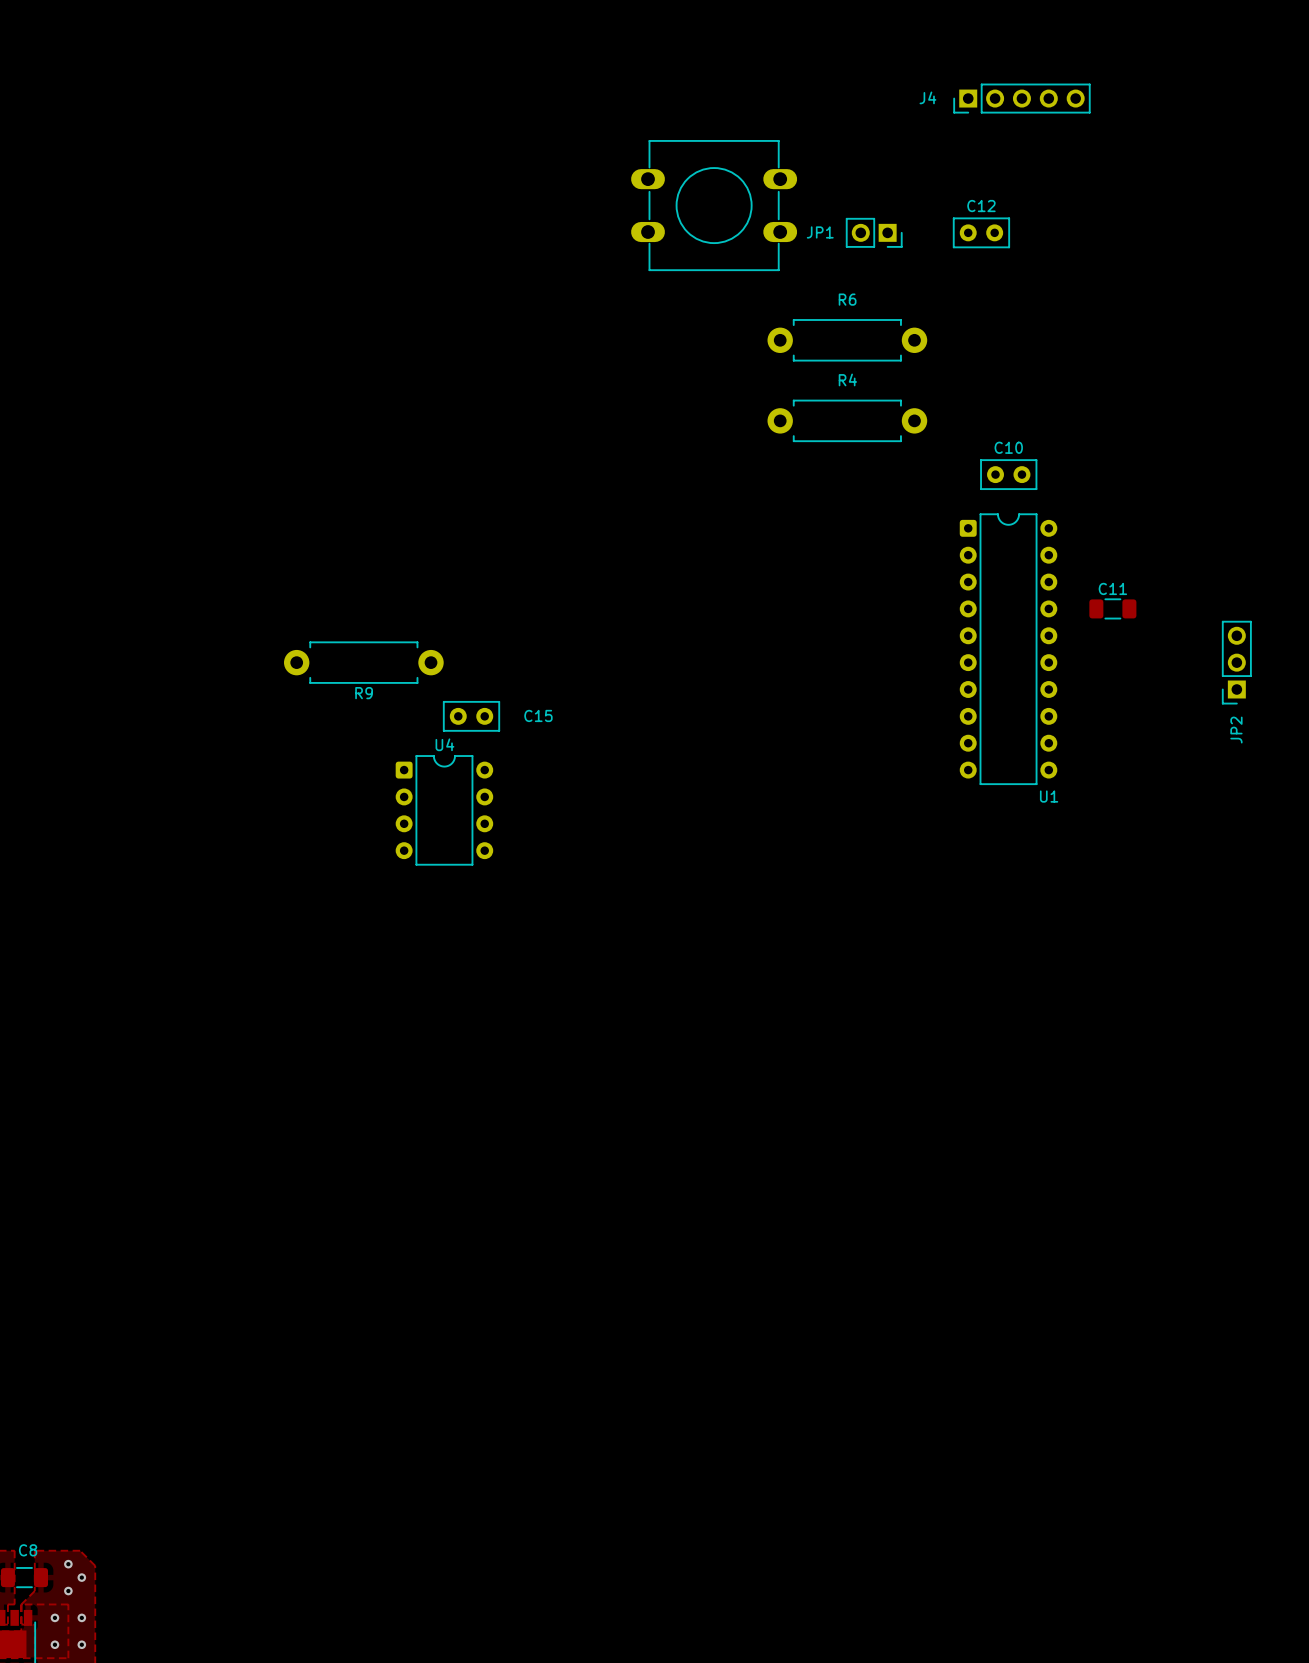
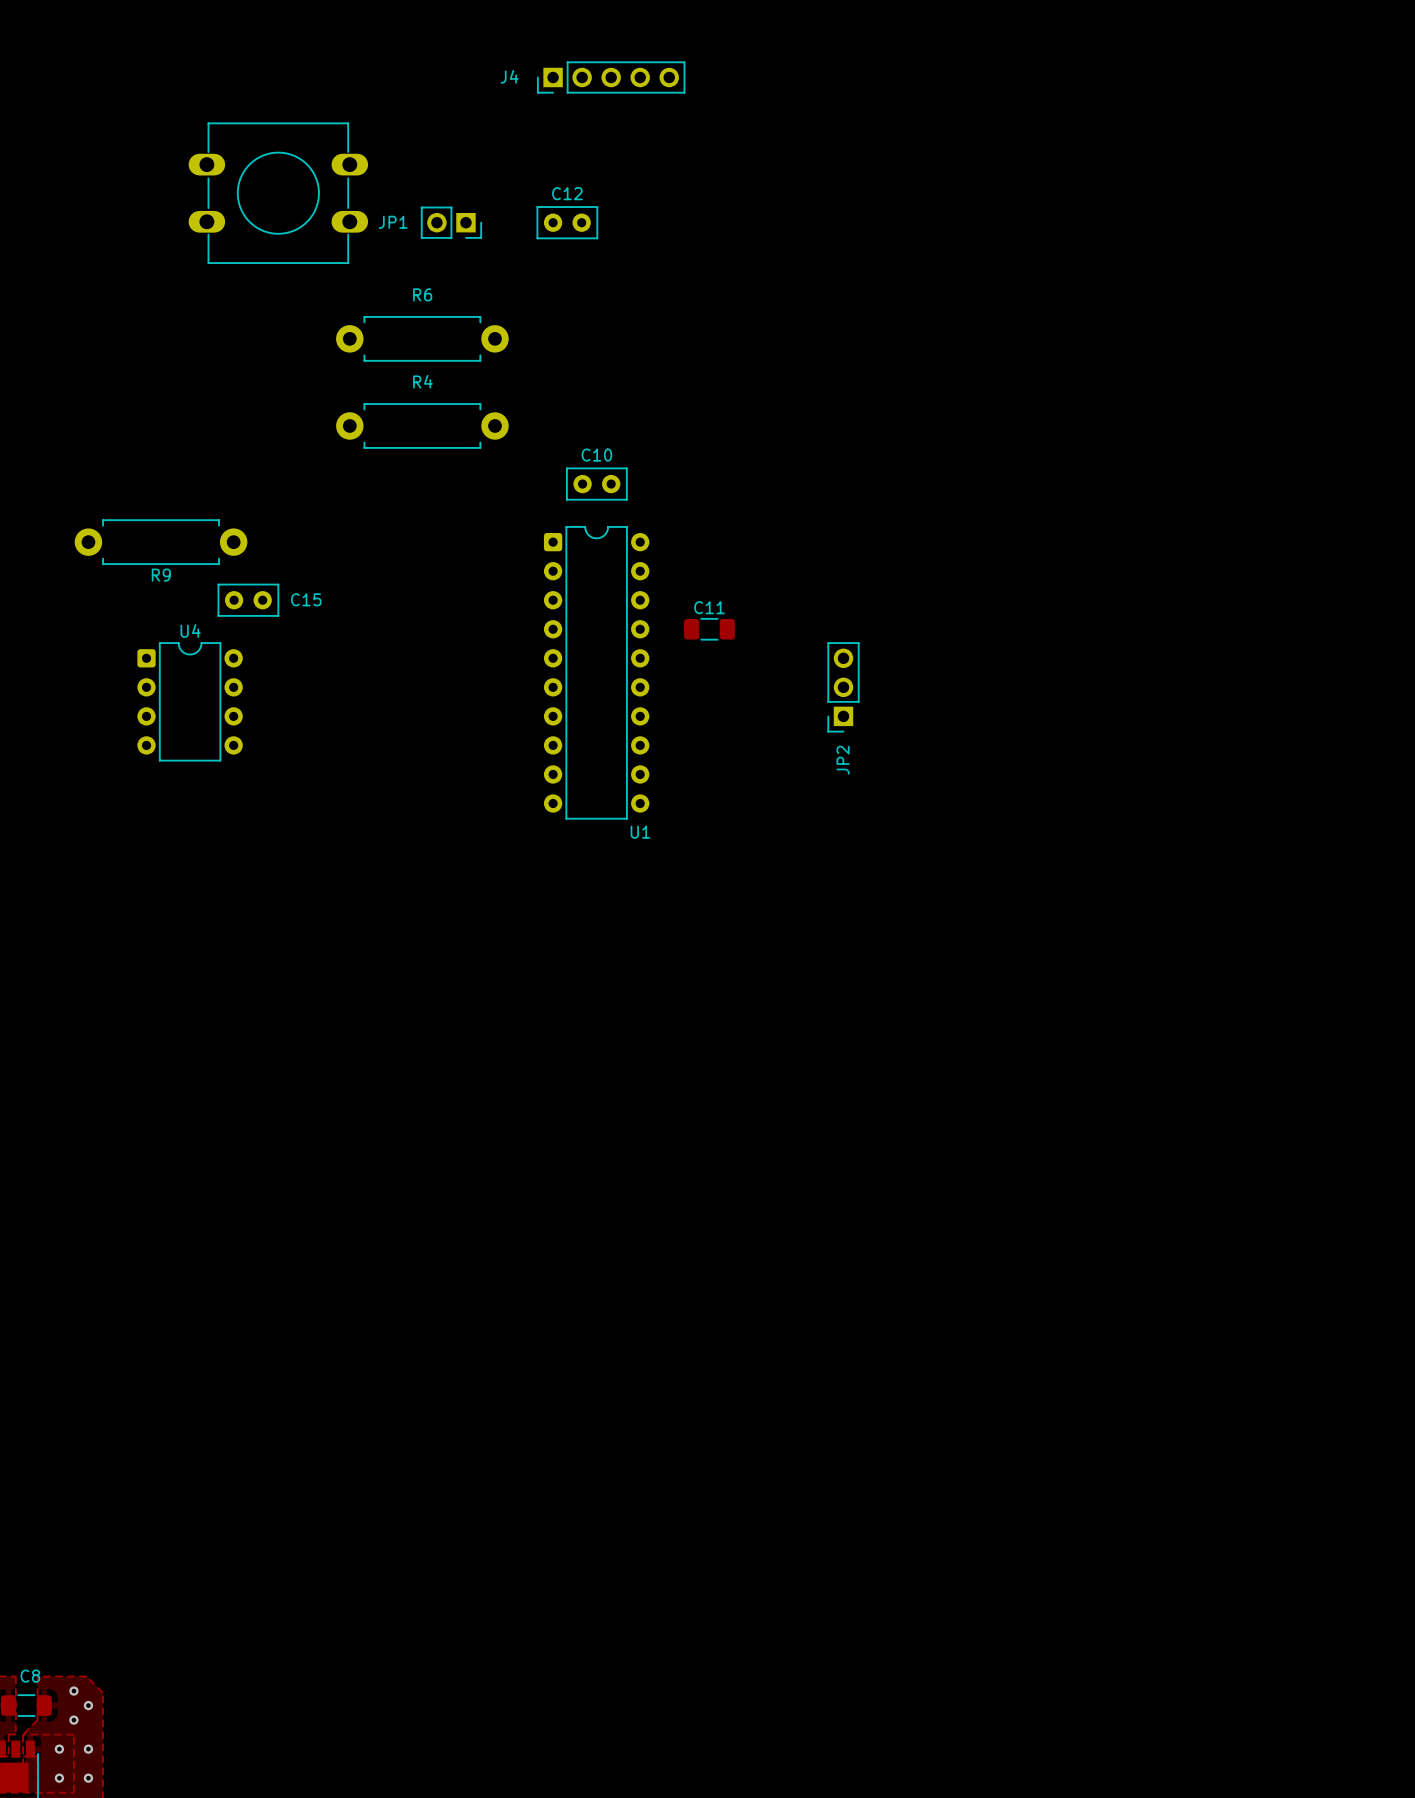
J4 position: (1021, 98) -> (611, 77)
part: none -> (278, 193)
part: (714, 205) -> none
JP1 position: (874, 232) -> (451, 222)
C12 position: (981, 232) -> (567, 222)
R6 position: (847, 340) -> (422, 338)
R4 position: (847, 420) -> (422, 425)
C10 position: (1008, 474) -> (596, 484)
C11 position: (1112, 608) -> (709, 629)
U1 position: (1008, 649) -> (596, 672)
R9 position: (363, 662) -> (161, 542)
JP2 position: (1236, 662) -> (843, 687)
C15 name position: C15 (538, 715) -> C15 (306, 599)
C15 position: (471, 716) -> (248, 600)
U4 position: (444, 810) -> (190, 701)

